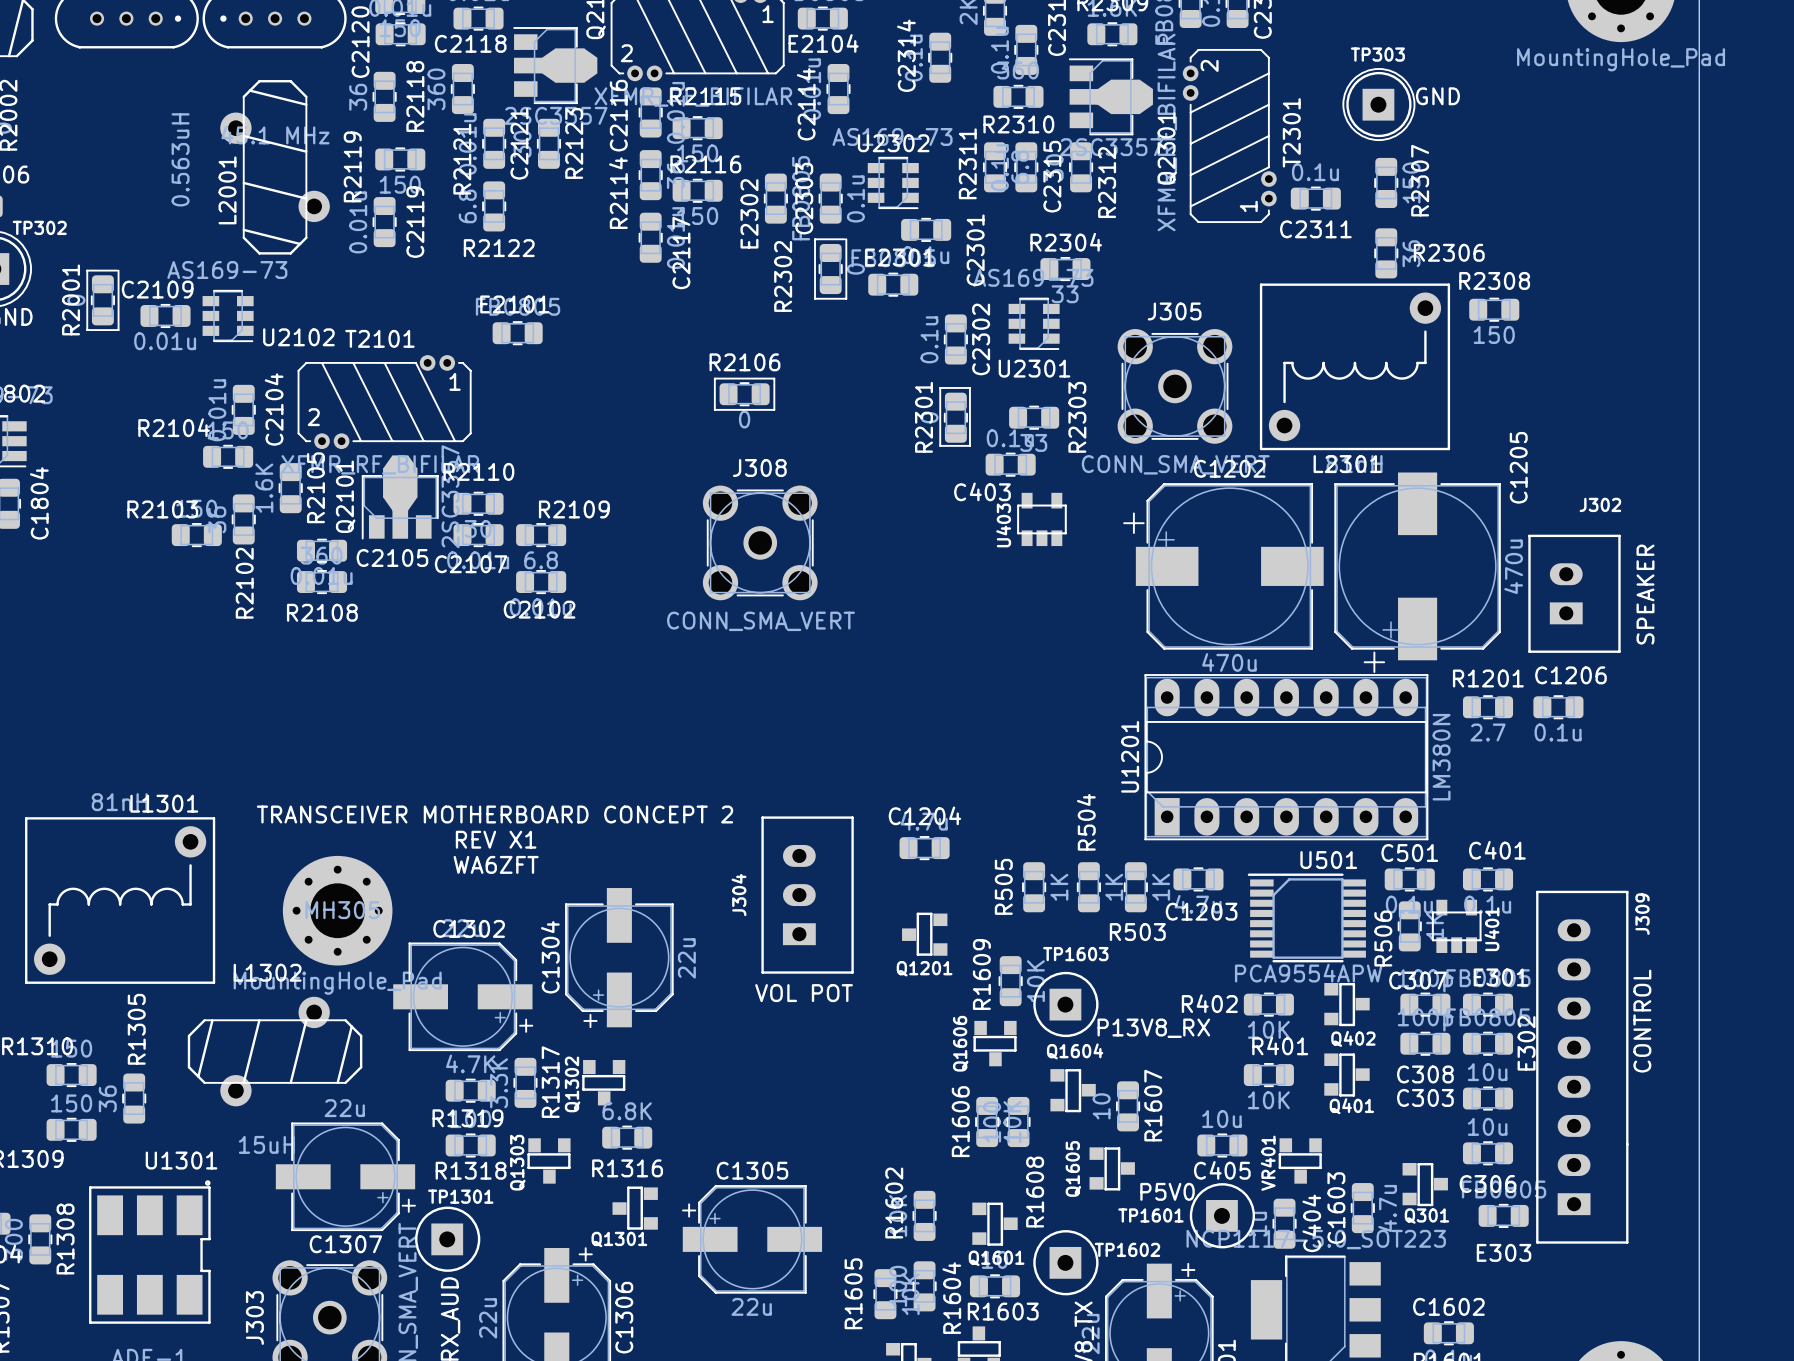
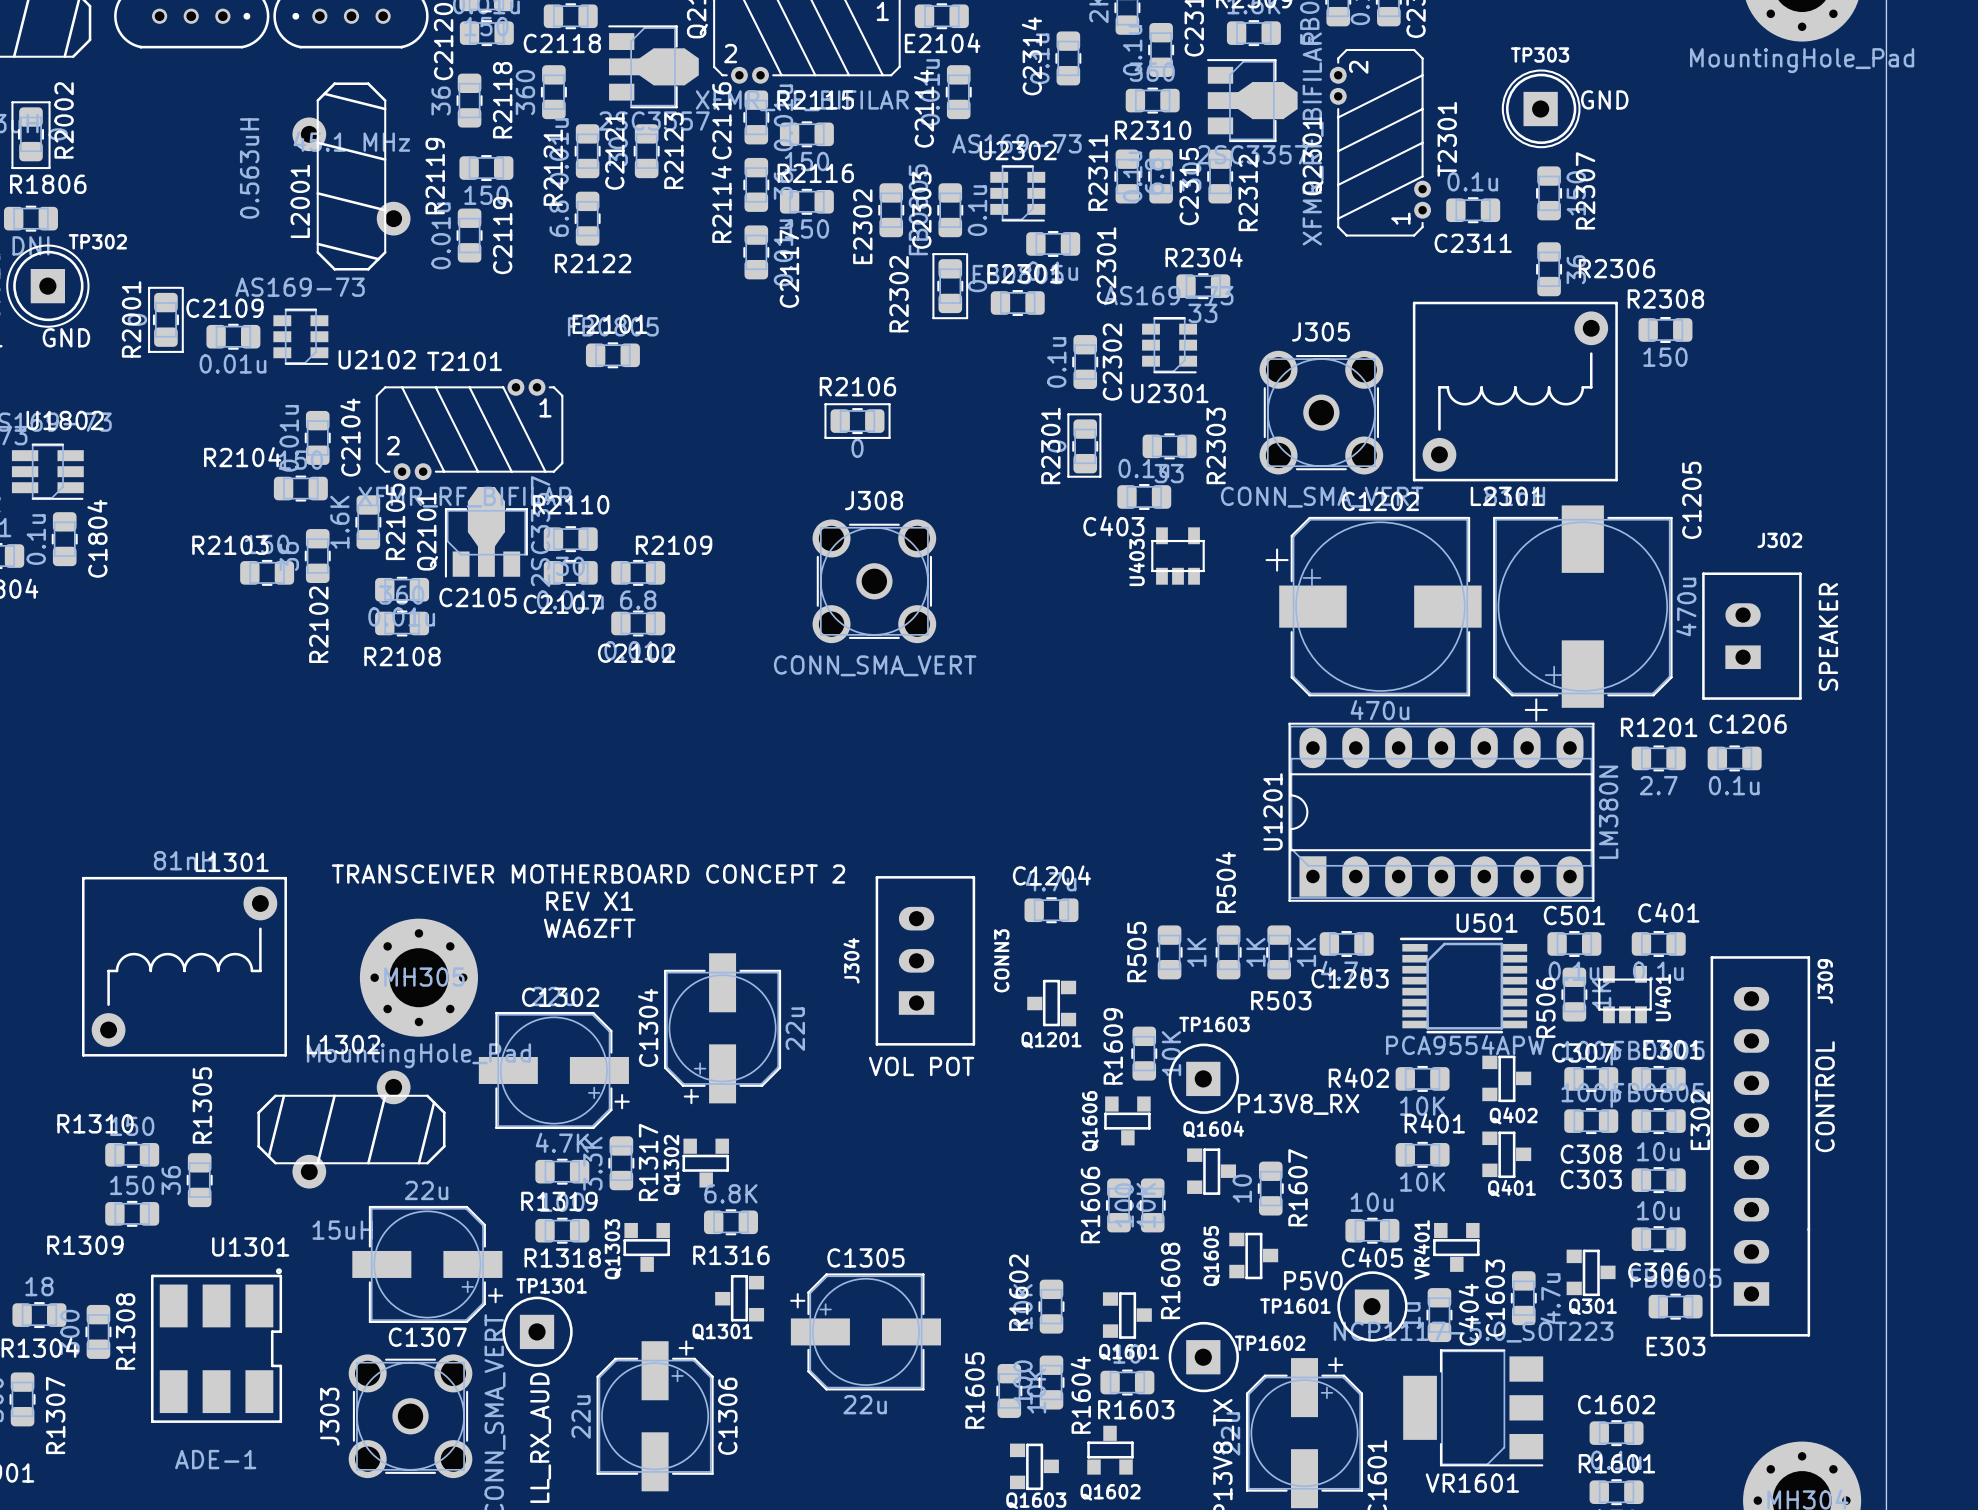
J304 value: none -> CONN3 (1001, 960)

